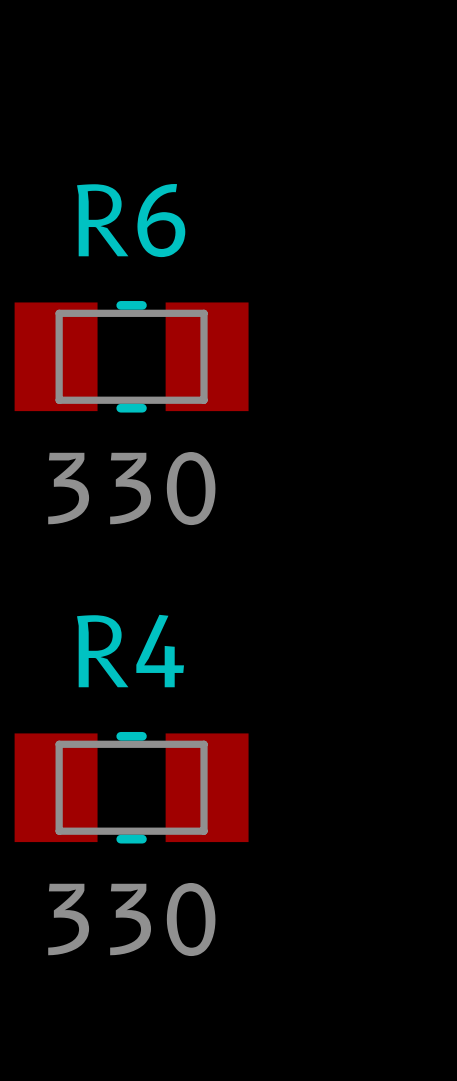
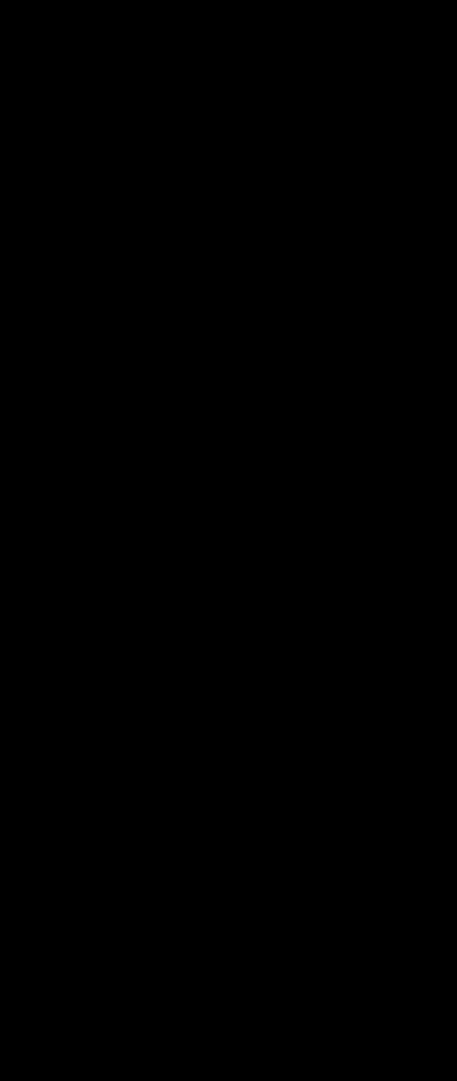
R6: 330 (131, 356) -> none
R4: 330 (131, 787) -> none

